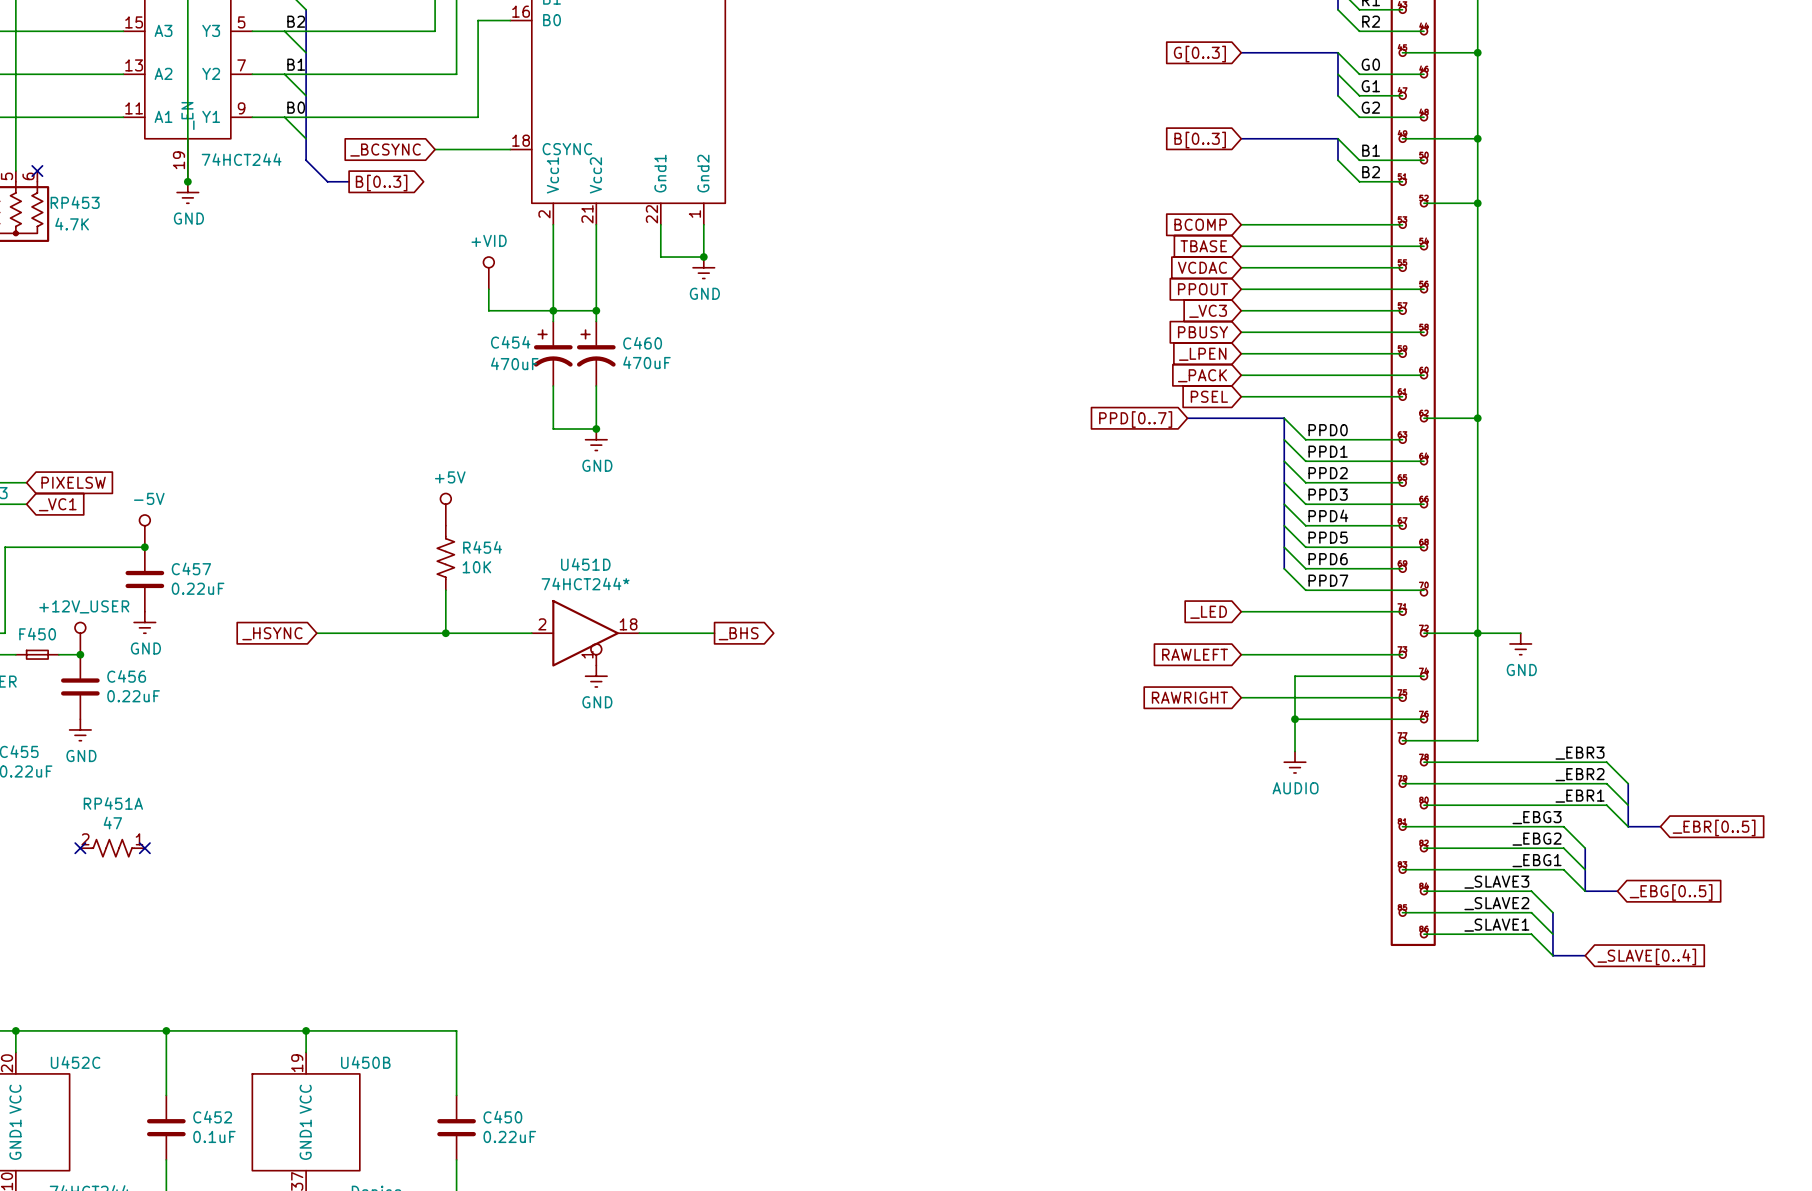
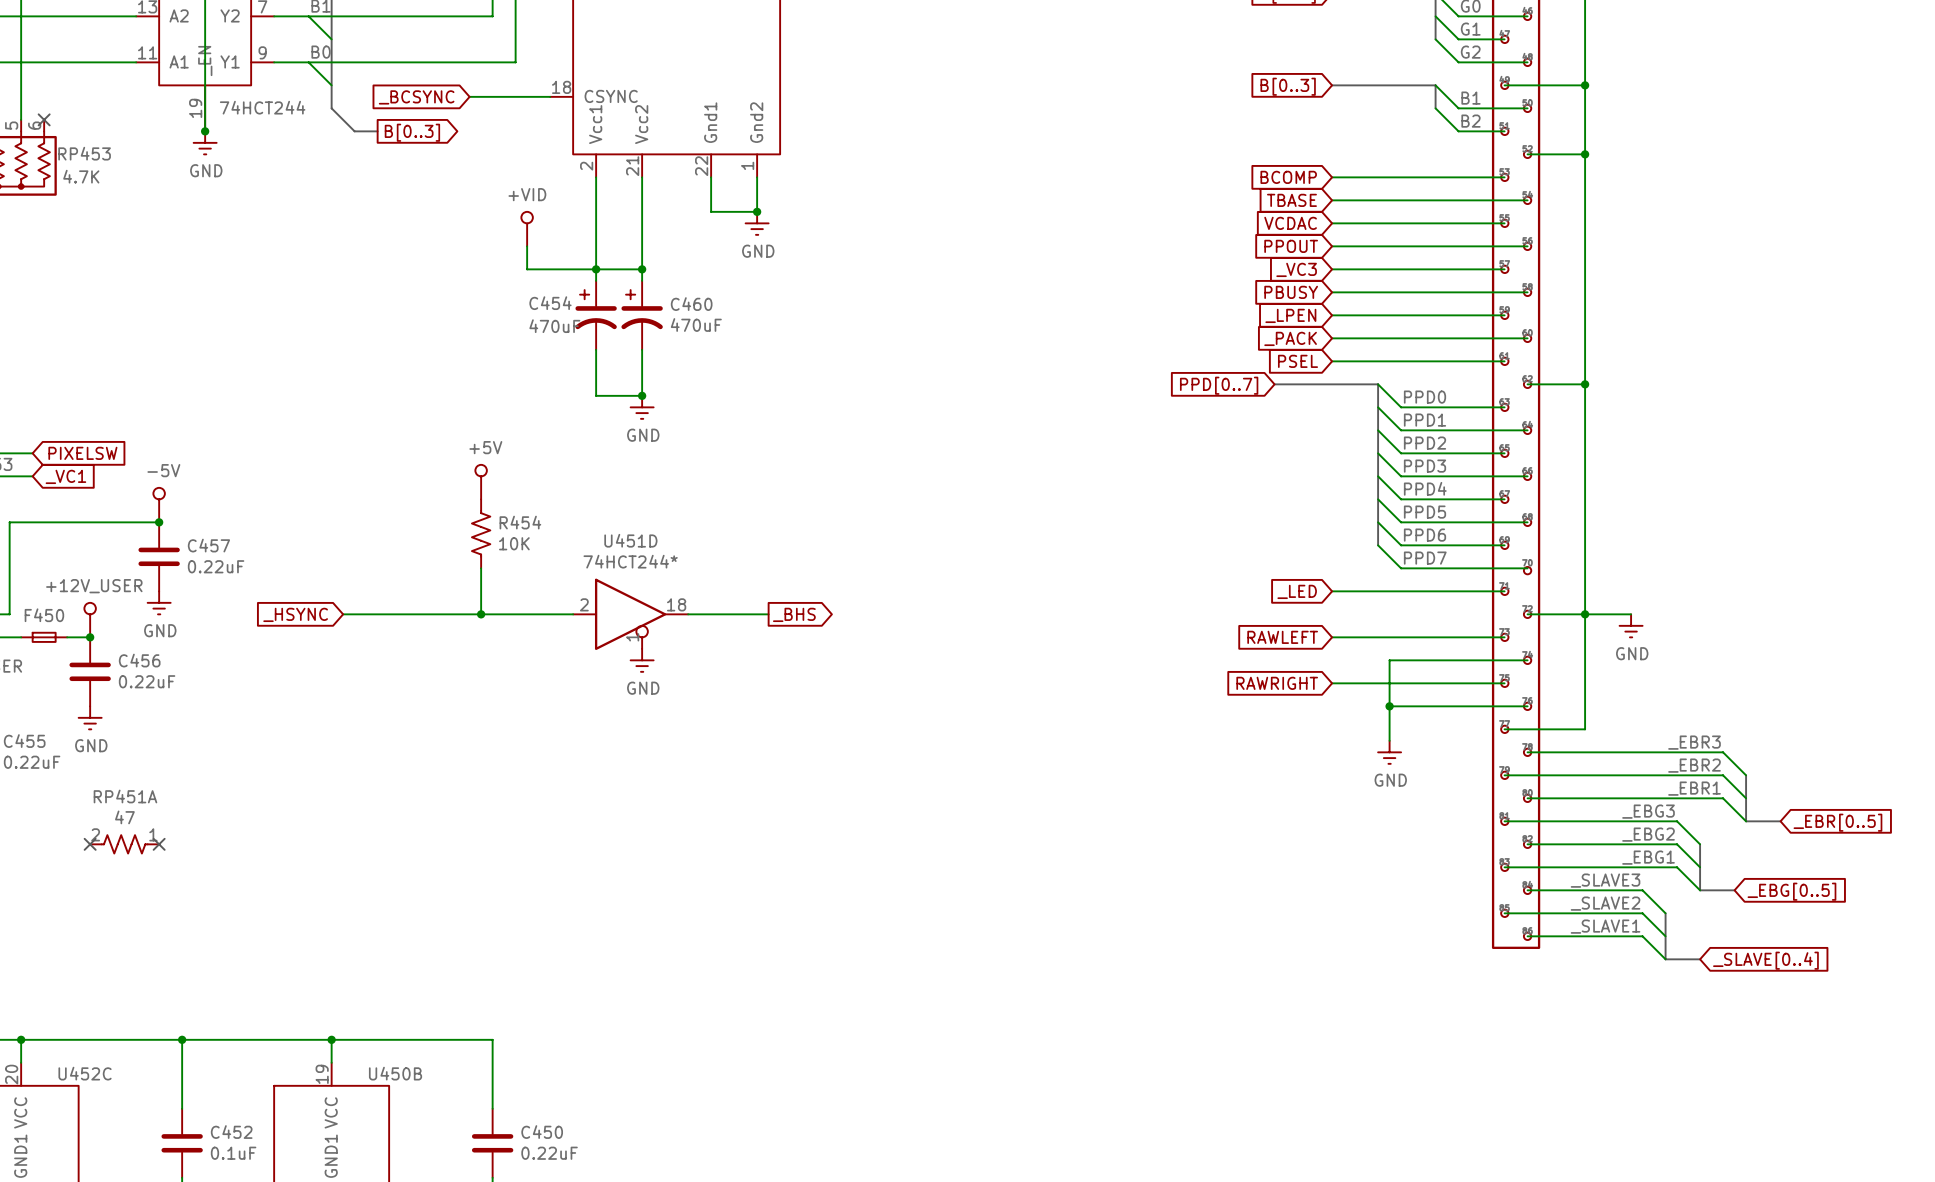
power symbol: AUDIO (1295, 762) -> GND (1389, 752)

